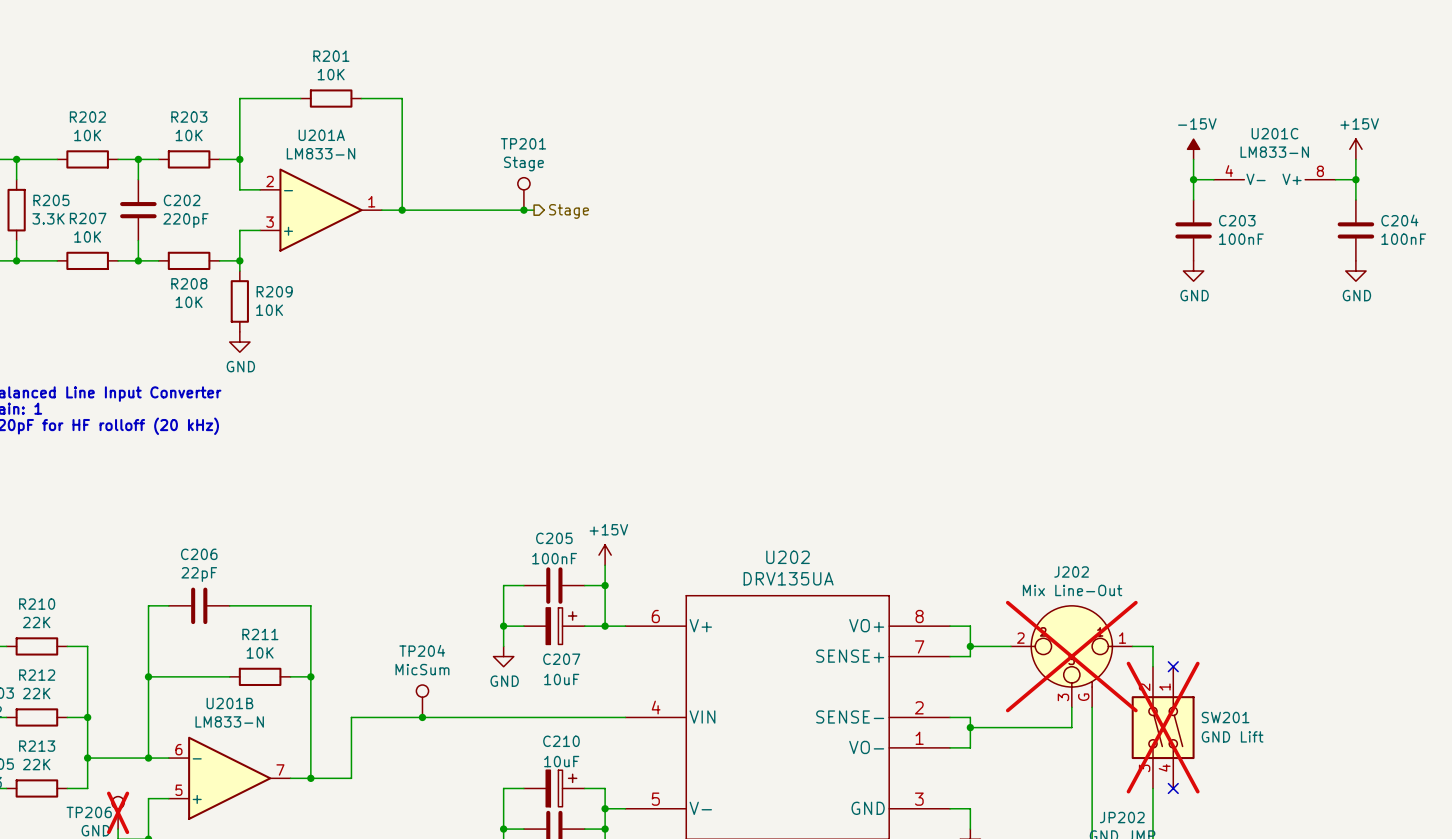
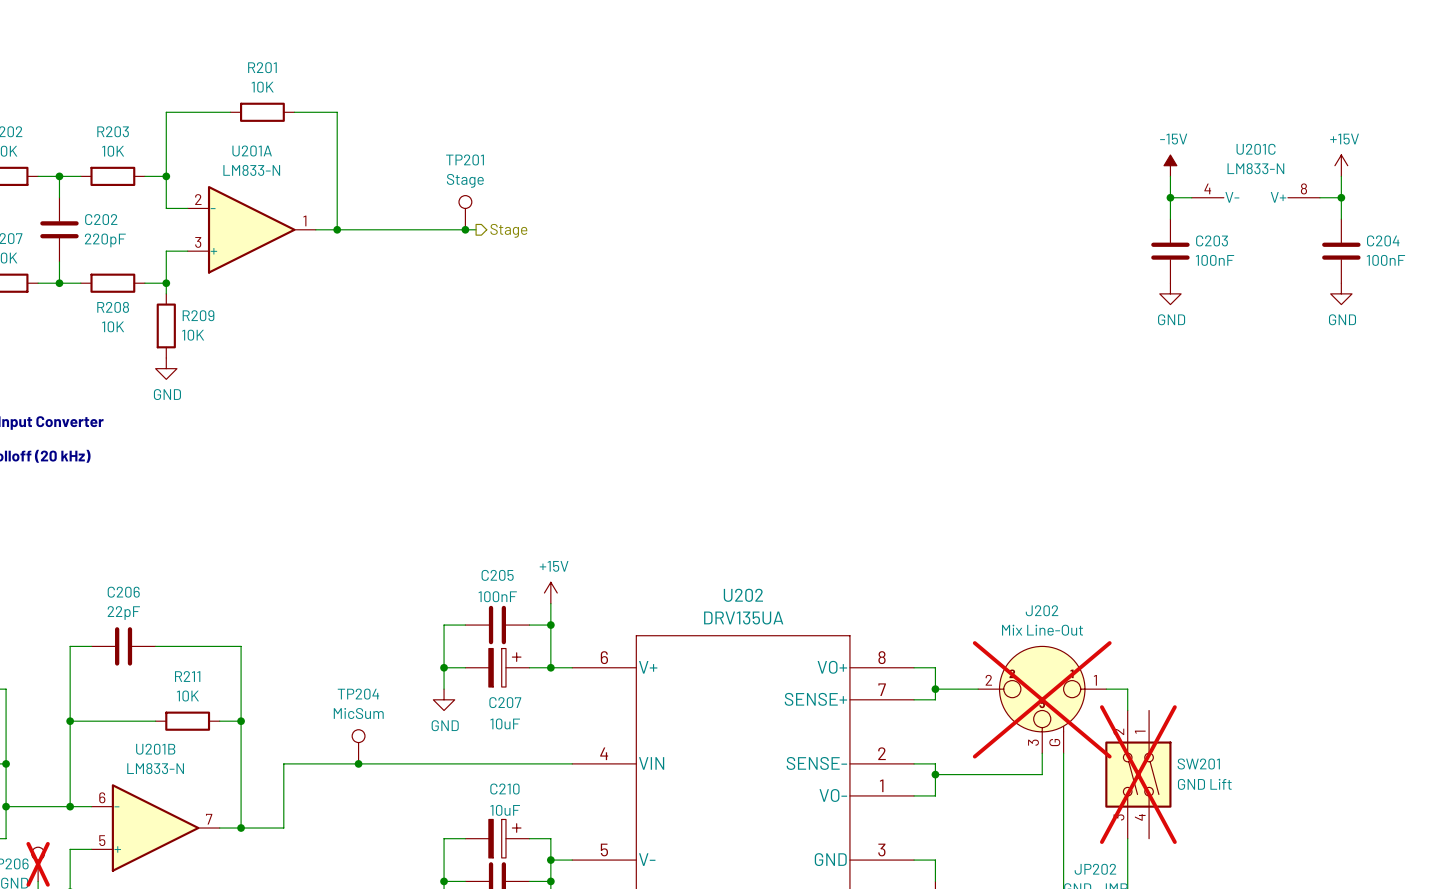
no-connect mark: (1173, 666) -> none
no-connect mark: (1173, 788) -> none

